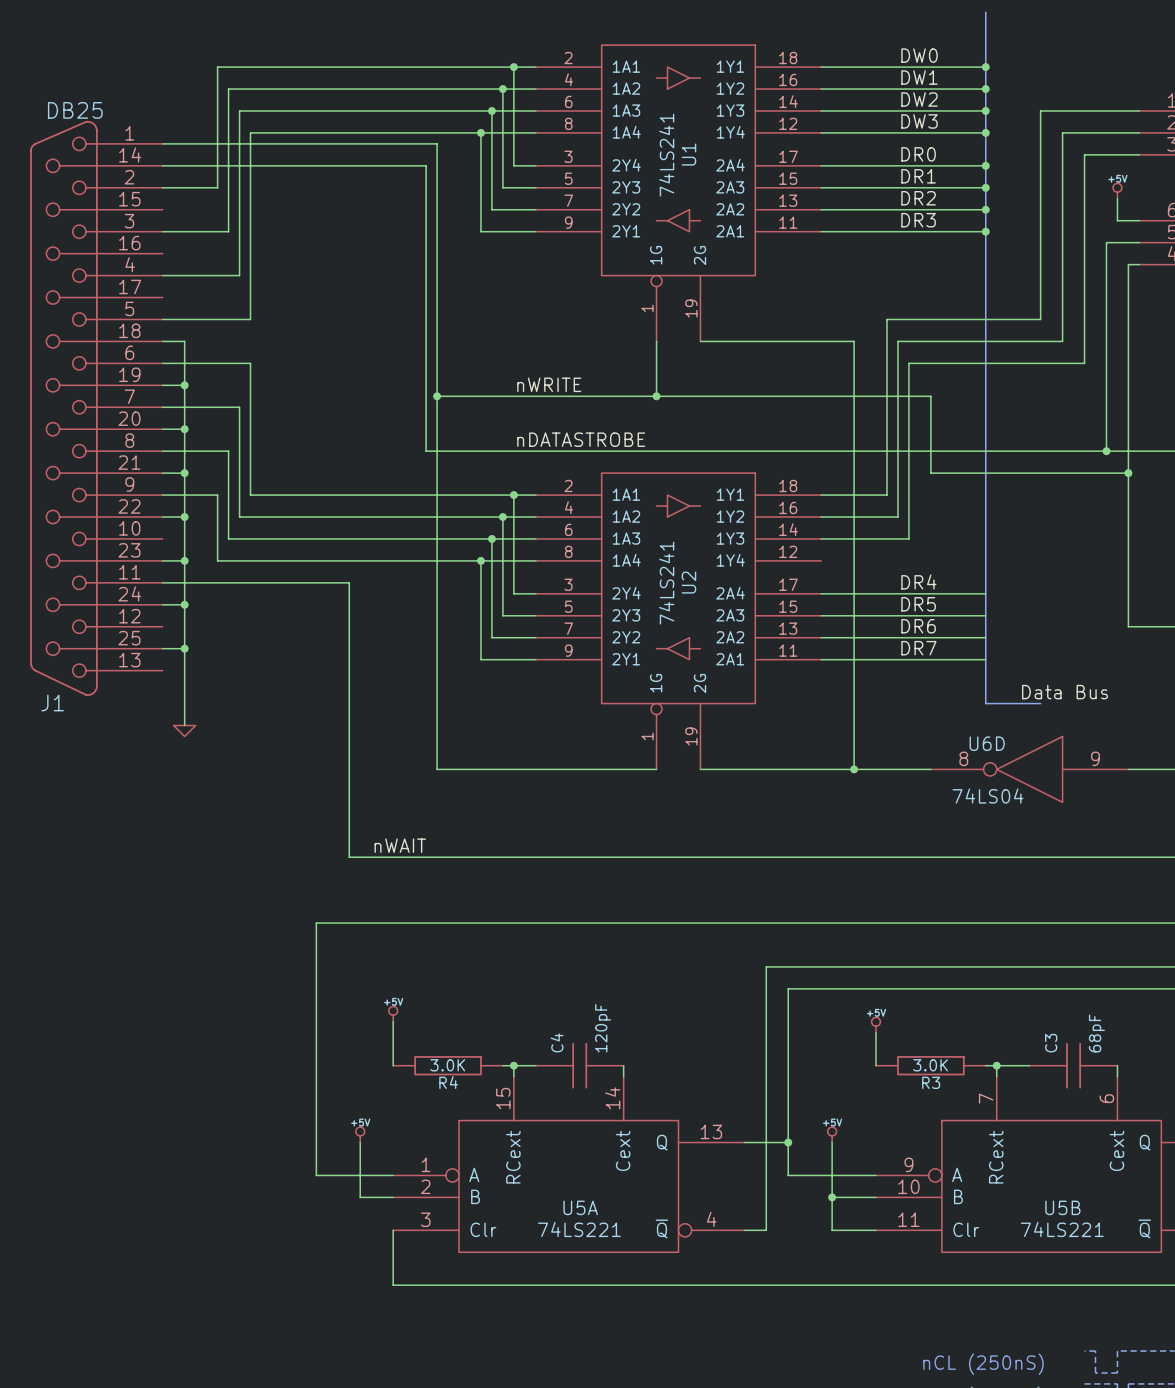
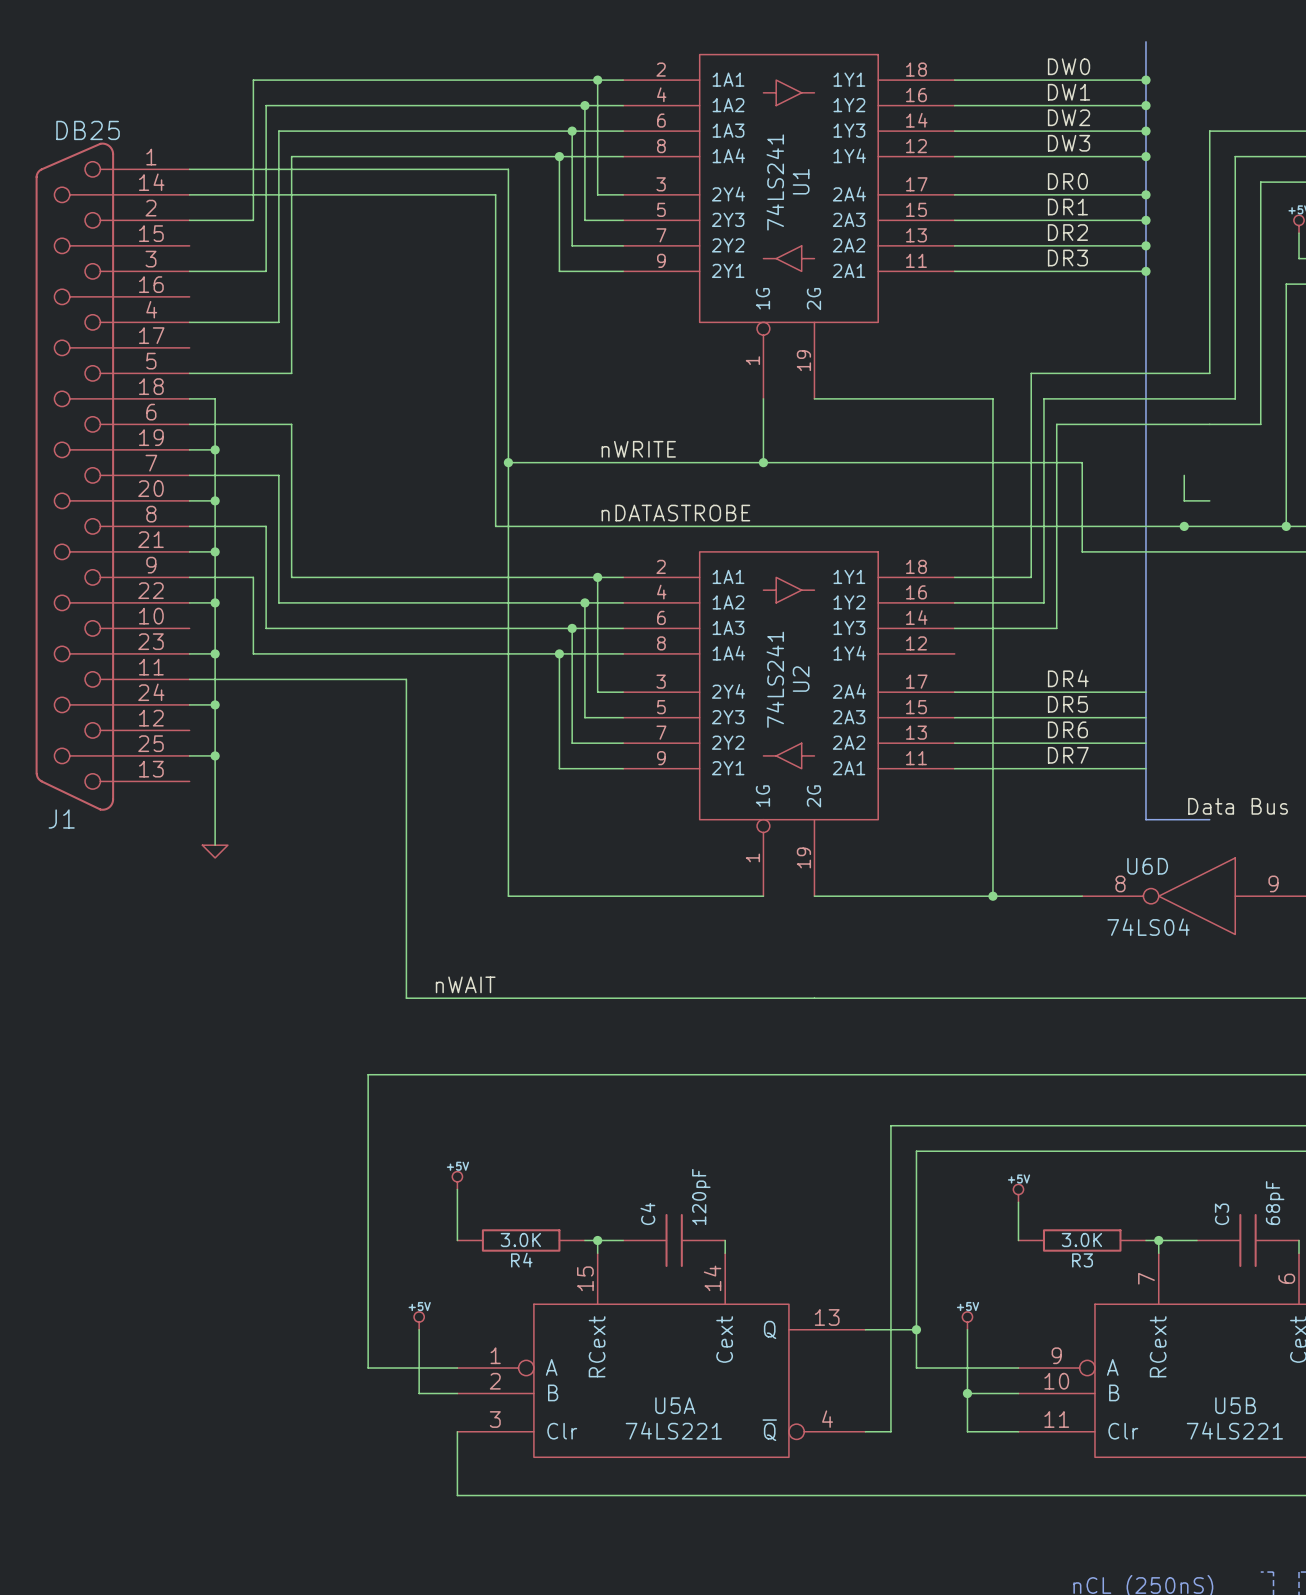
bus: (985, 12) (985, 34) -> none
wire: none -> (1184, 475) (1184, 500) (1209, 500)
junction: none -> (1184, 526)

